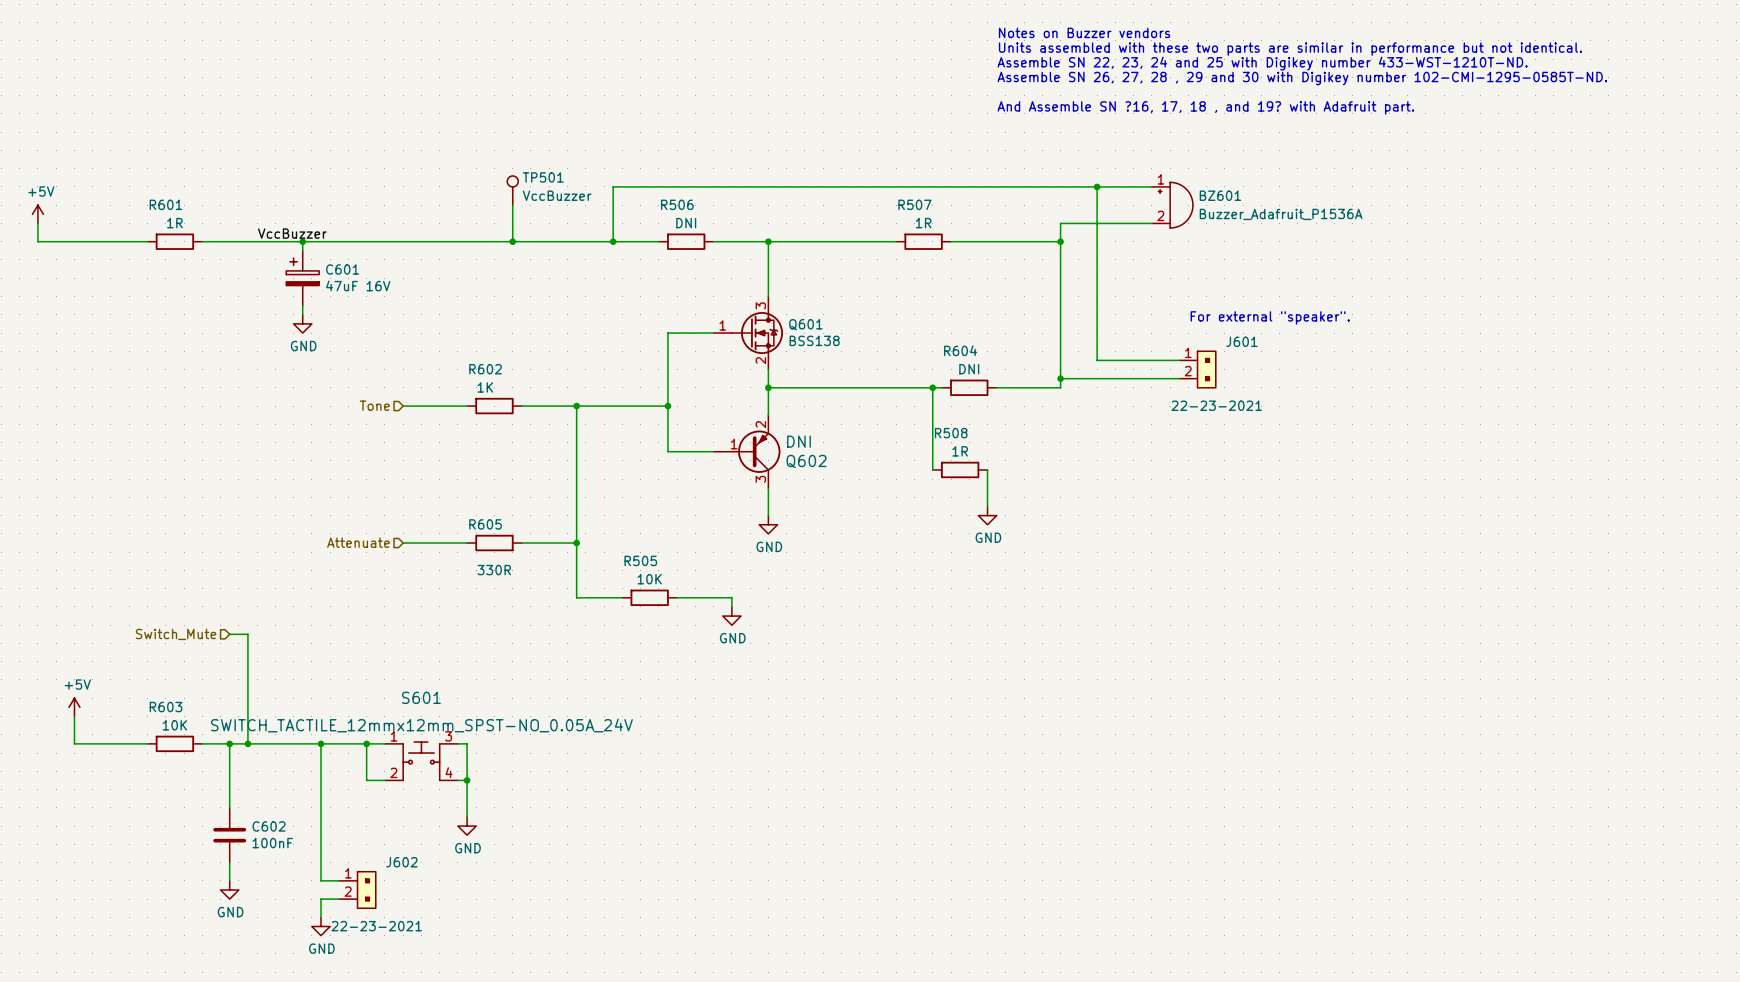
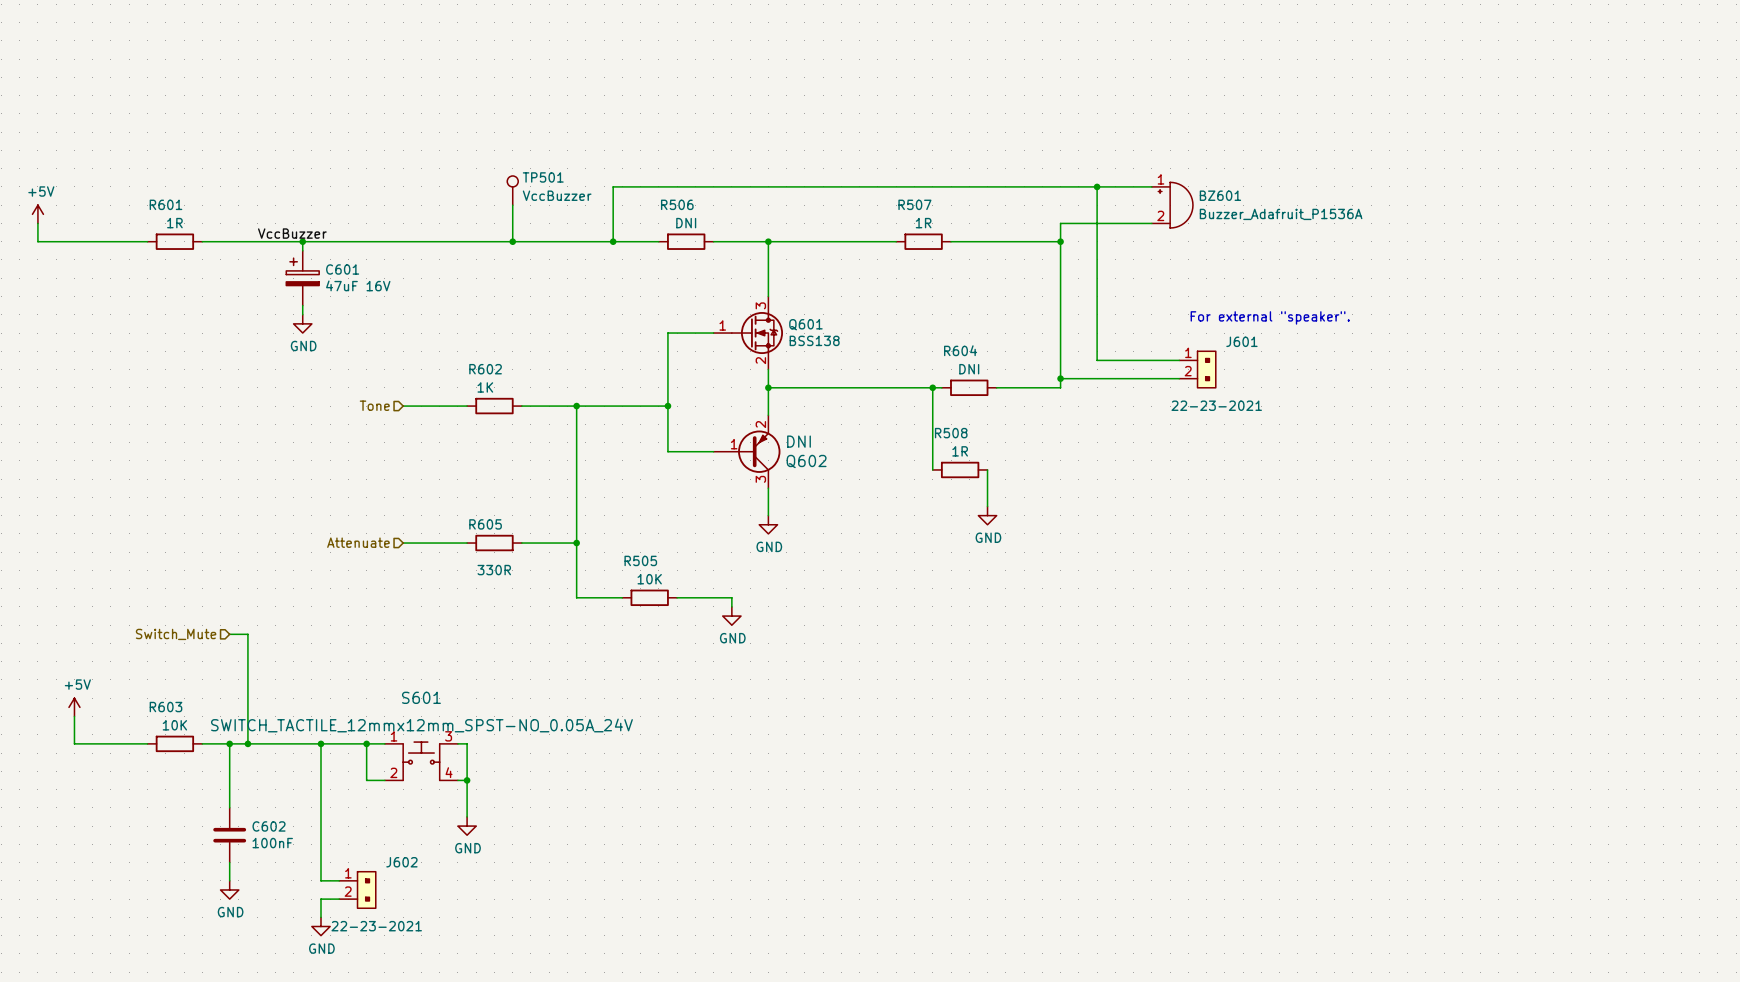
text: Notes on Buzzer vendors (1084, 32) -> none
text: Units assembled with these two parts are similar in performance but not identical. (1290, 49) -> none
text: Assemble SN 22, 23, 24 and 25 with Digikey number 433-WST-1210T-ND. (1262, 63) -> none
text: Assemble SN 26, 27, 28 , 29 and 30 with Digikey number 102-CMI-1295-0585T-ND. (1302, 78) -> none
text: And Assemble SN ?16, 17, 18 , and 19? with Adafruit part. (1205, 107) -> none

